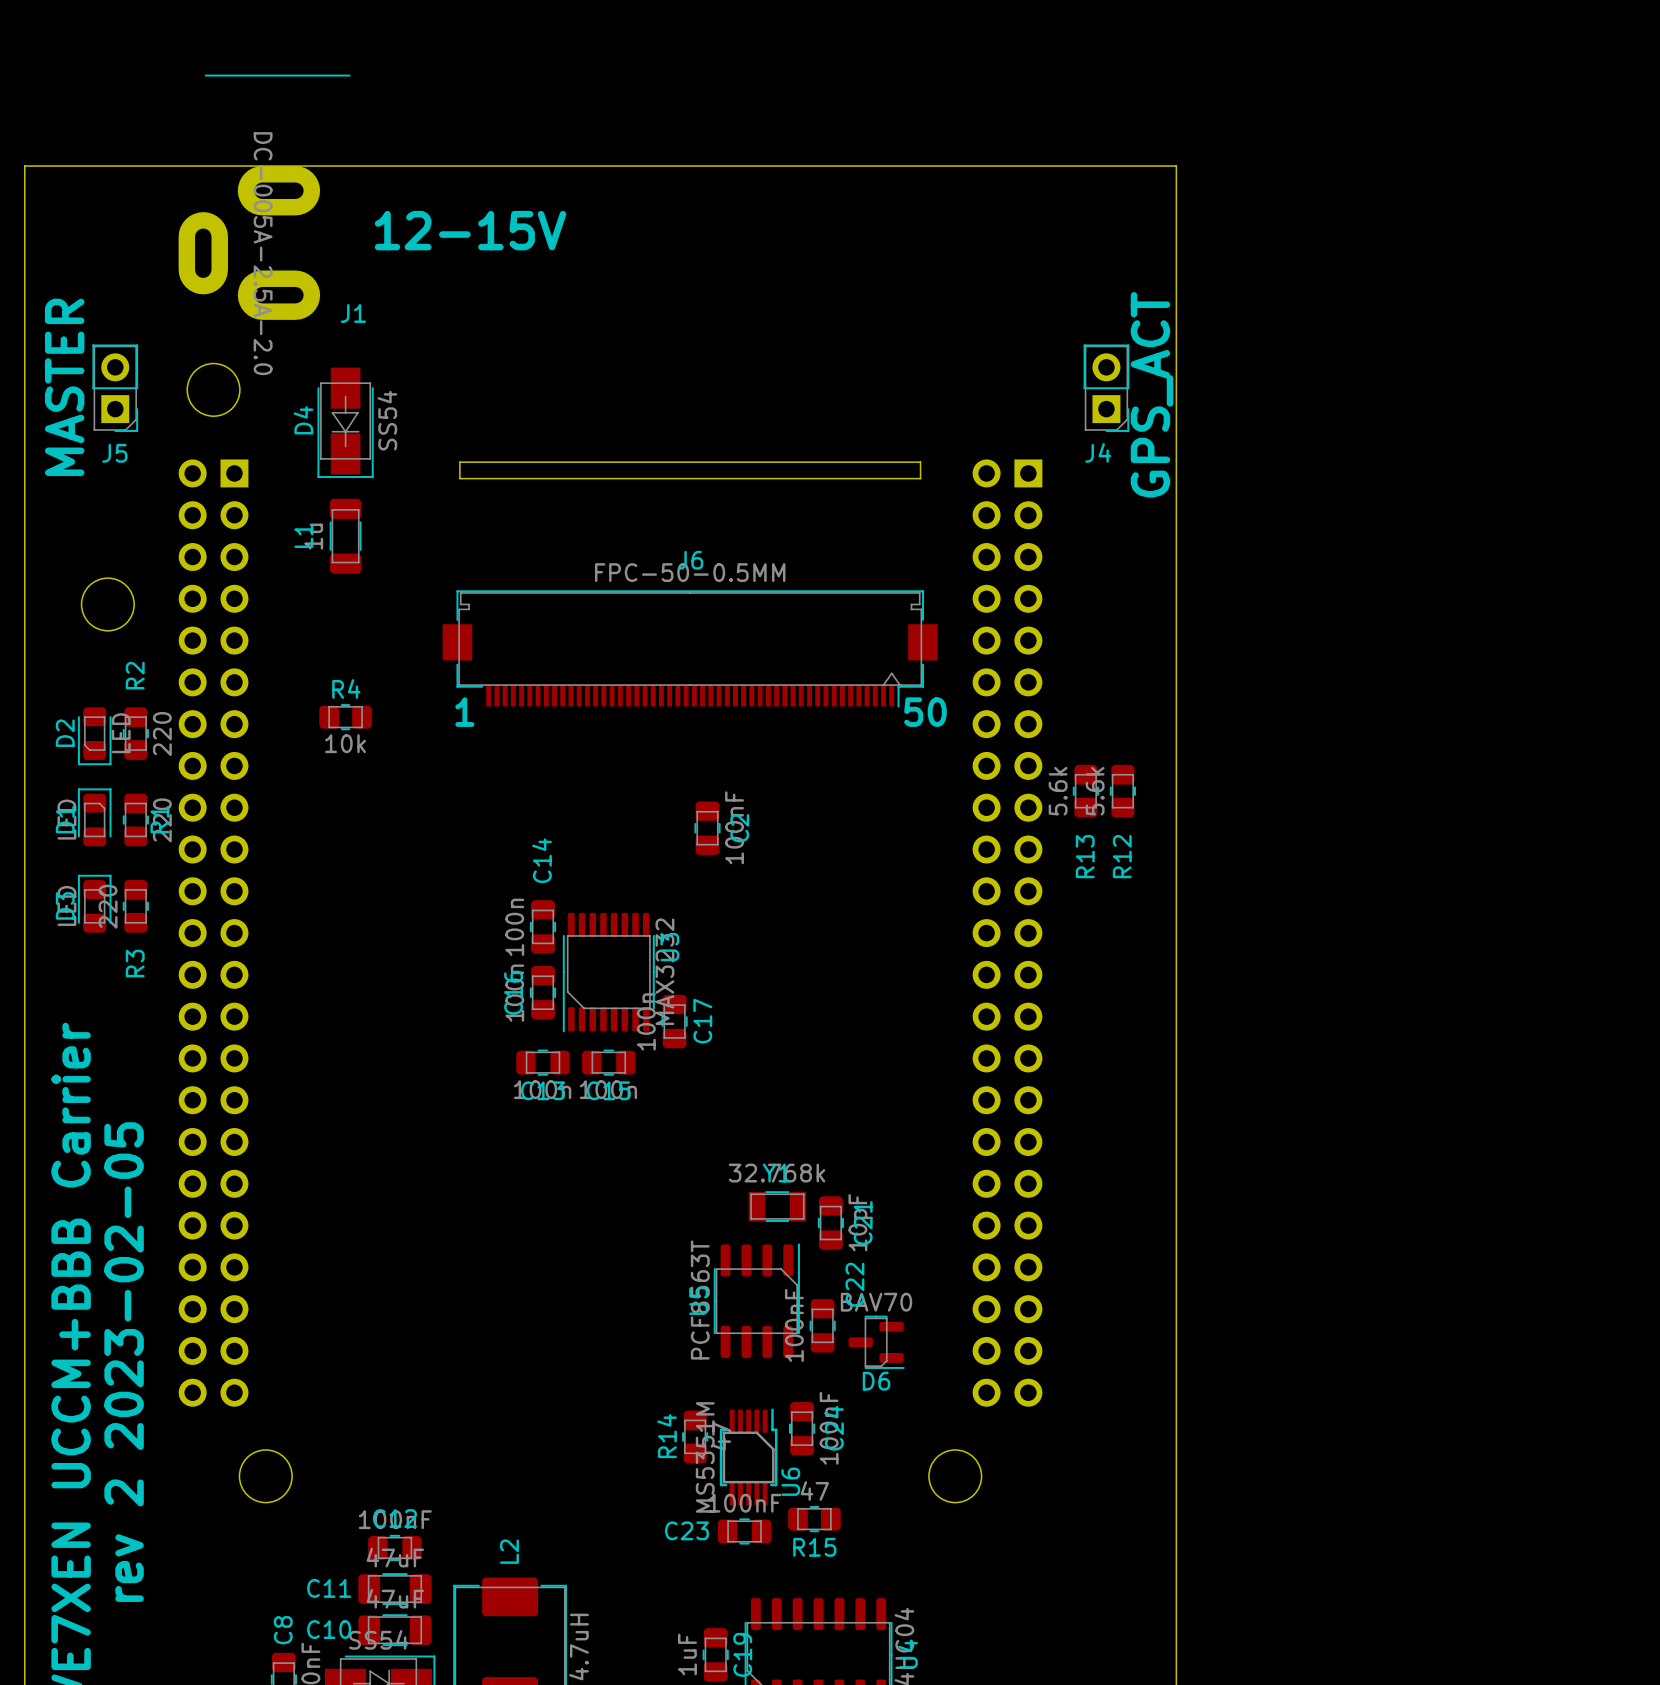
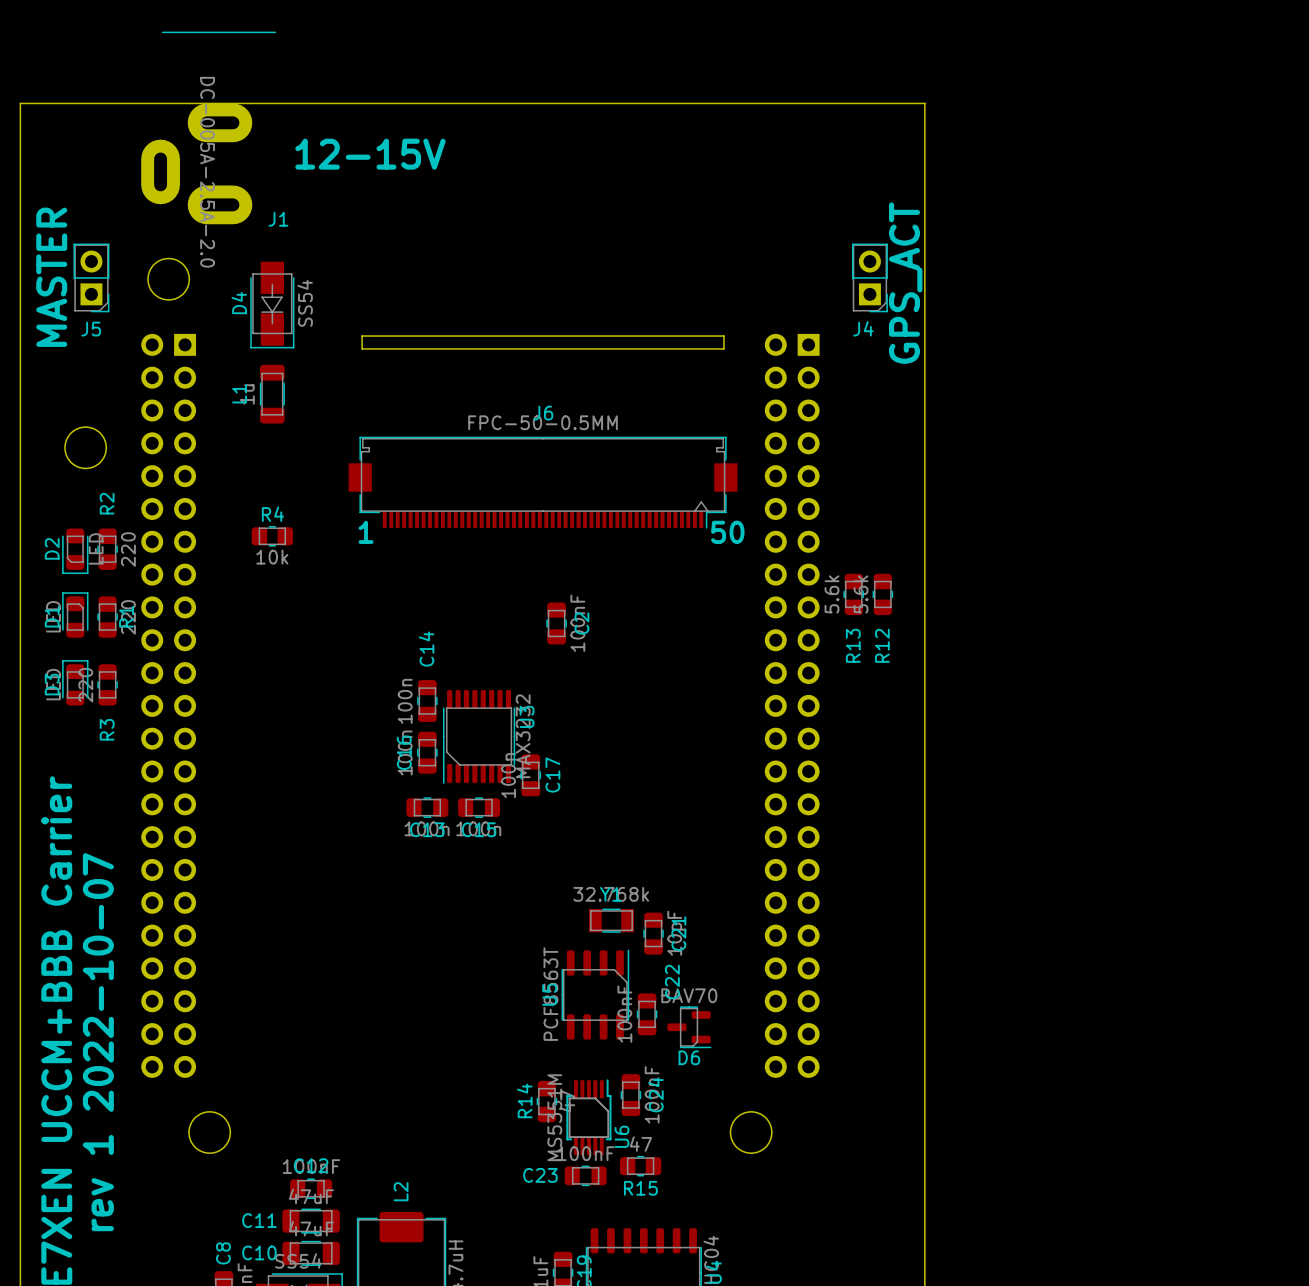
text: rev 2 2023-02-05 (124, 1362) -> rev 1 2022-10-07 (98, 1042)

